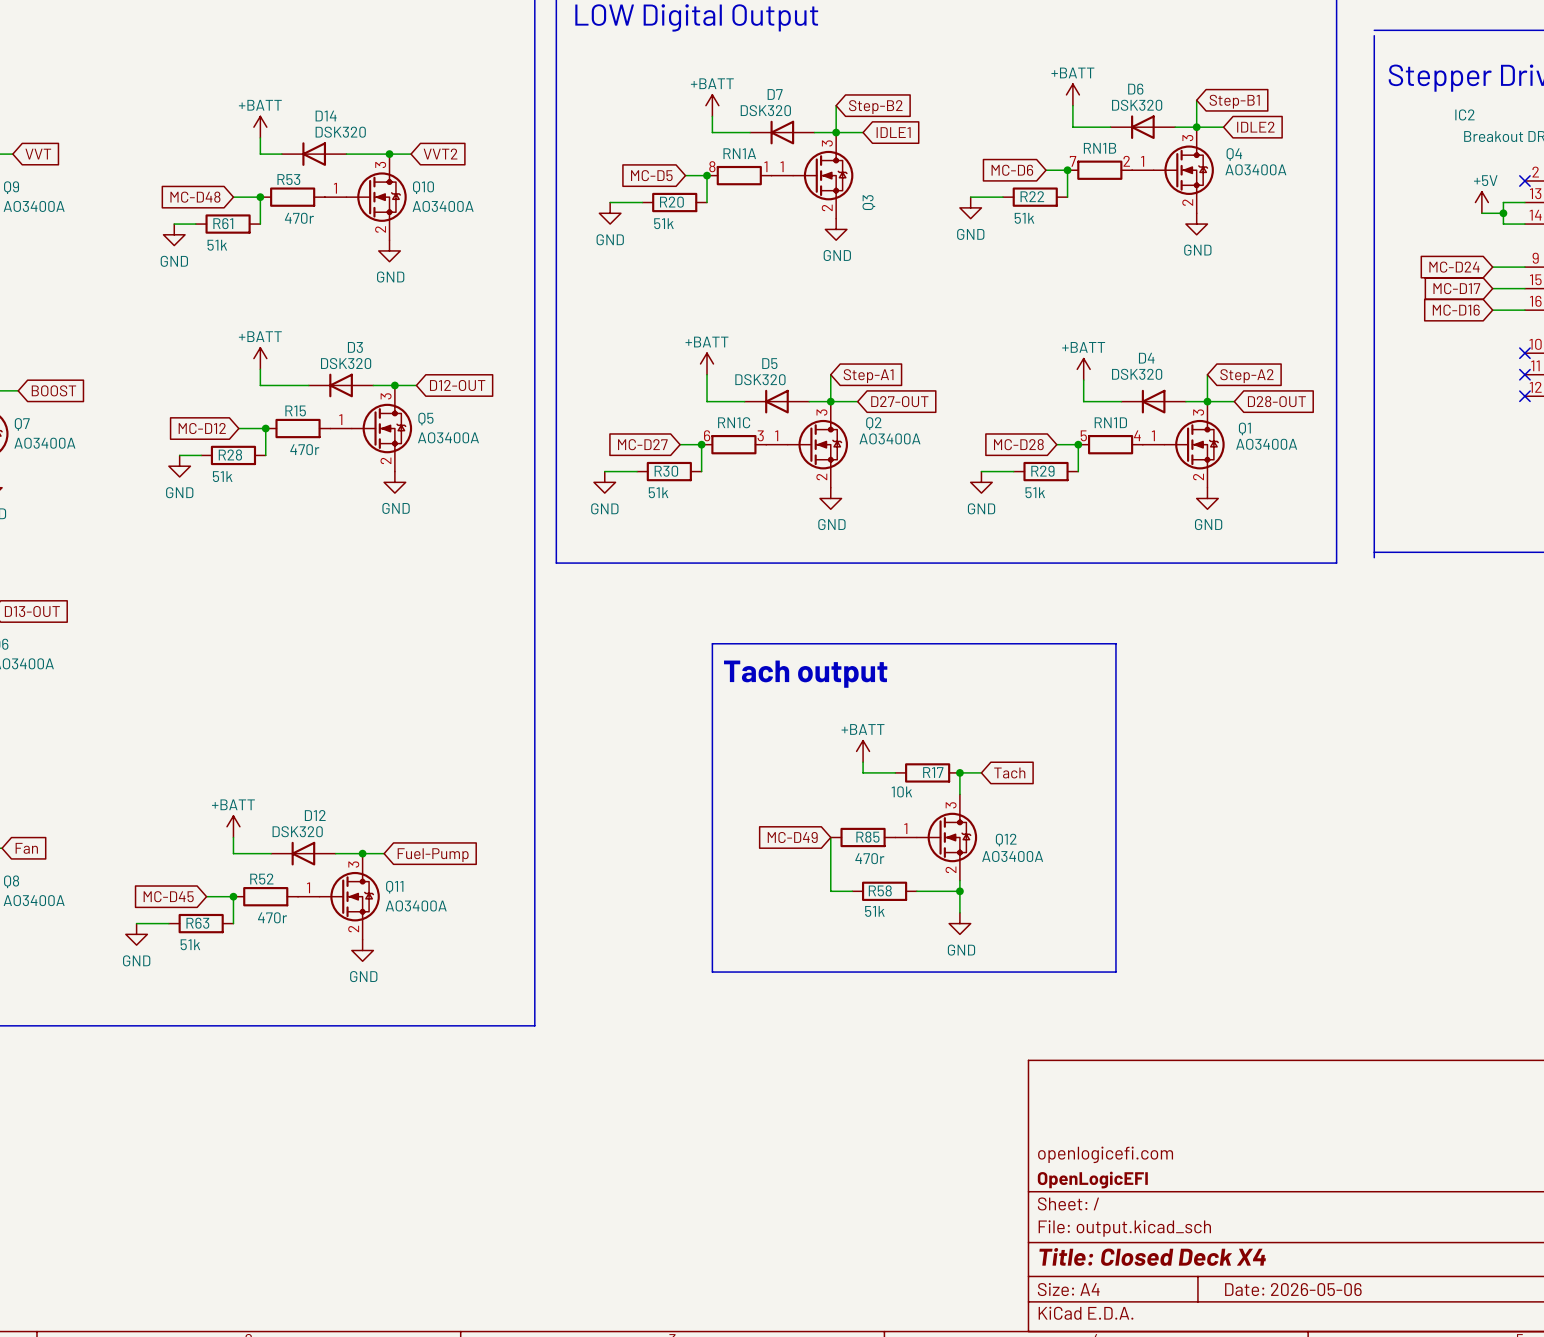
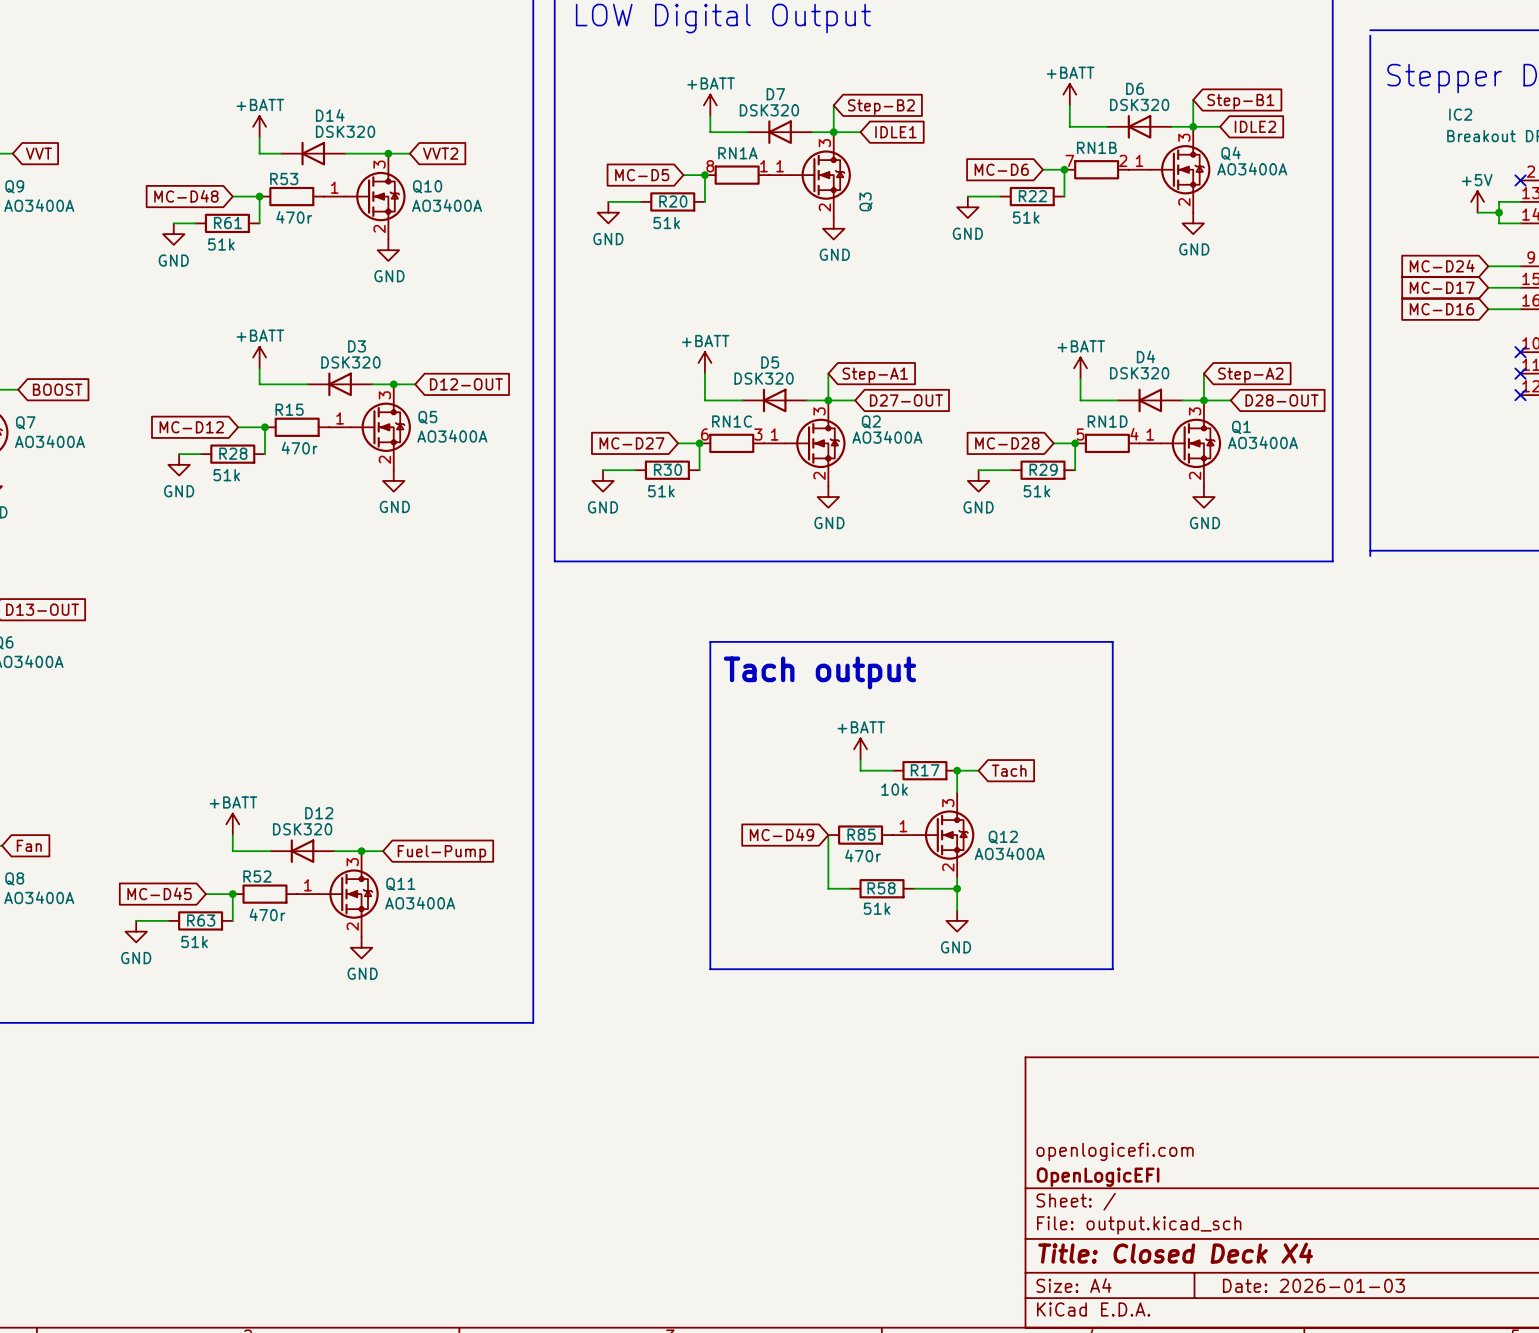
title block: Date: 2026-05-06 (1293, 1289) -> Date: 2026-01-03 (1313, 1285)

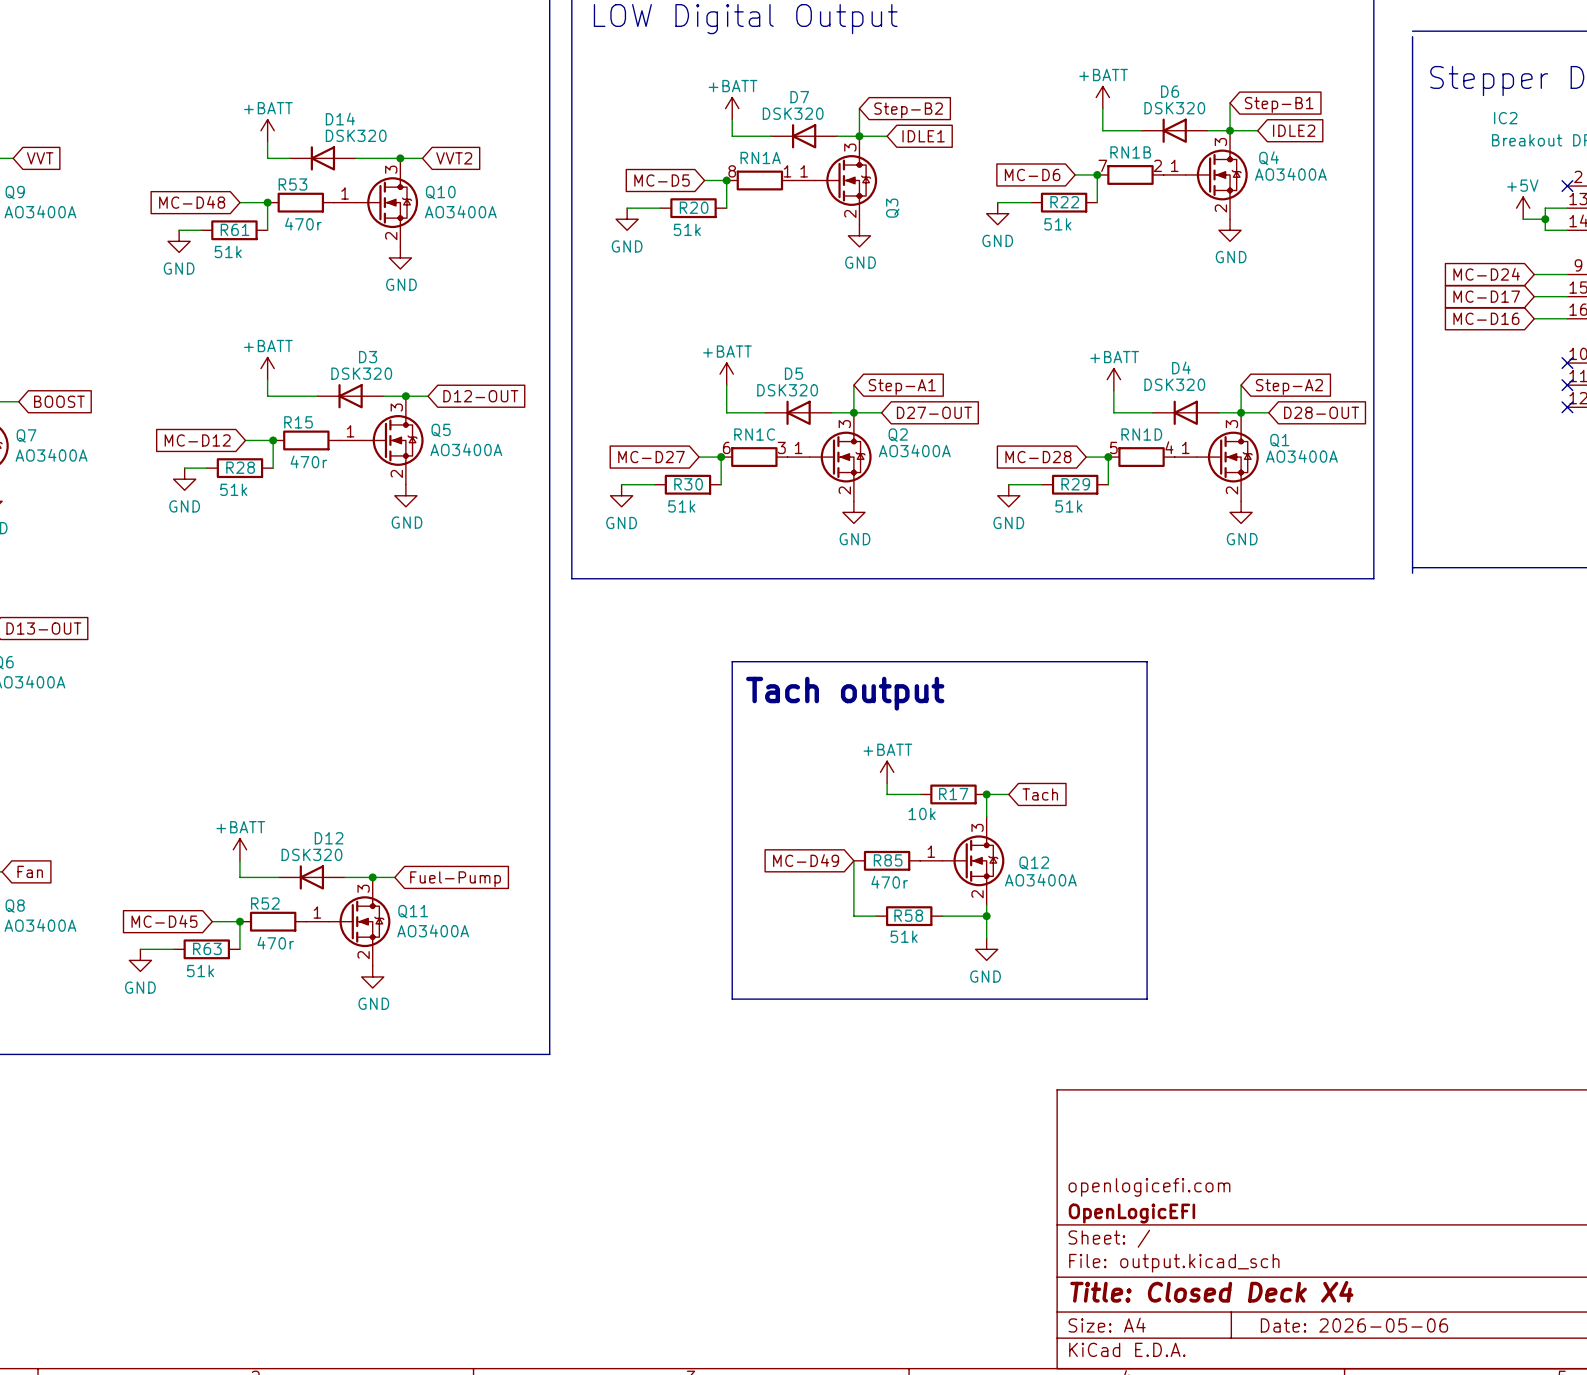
title block: Date: 2026-01-03 (1313, 1285) -> Date: 2026-05-06 (1354, 1325)

